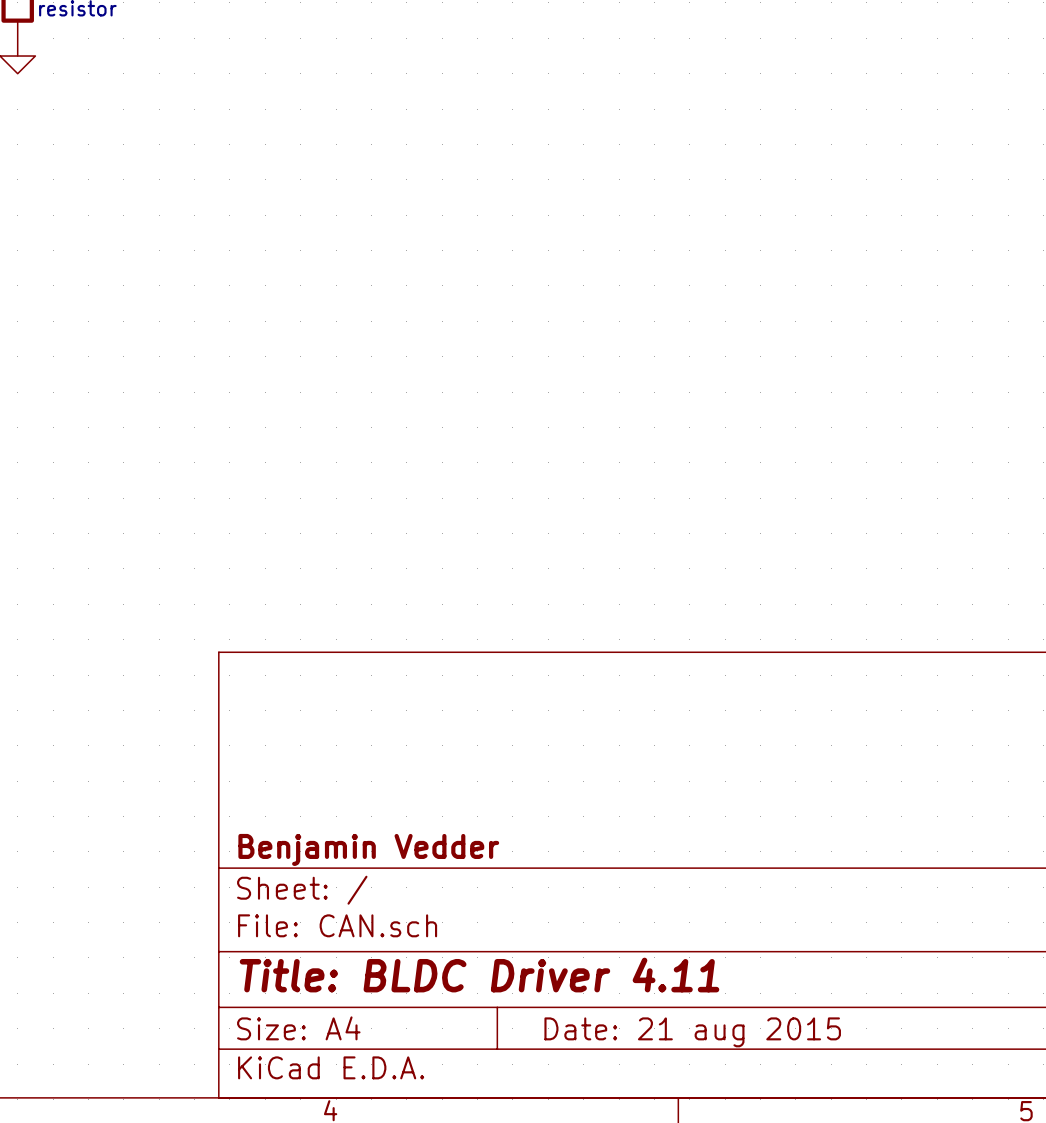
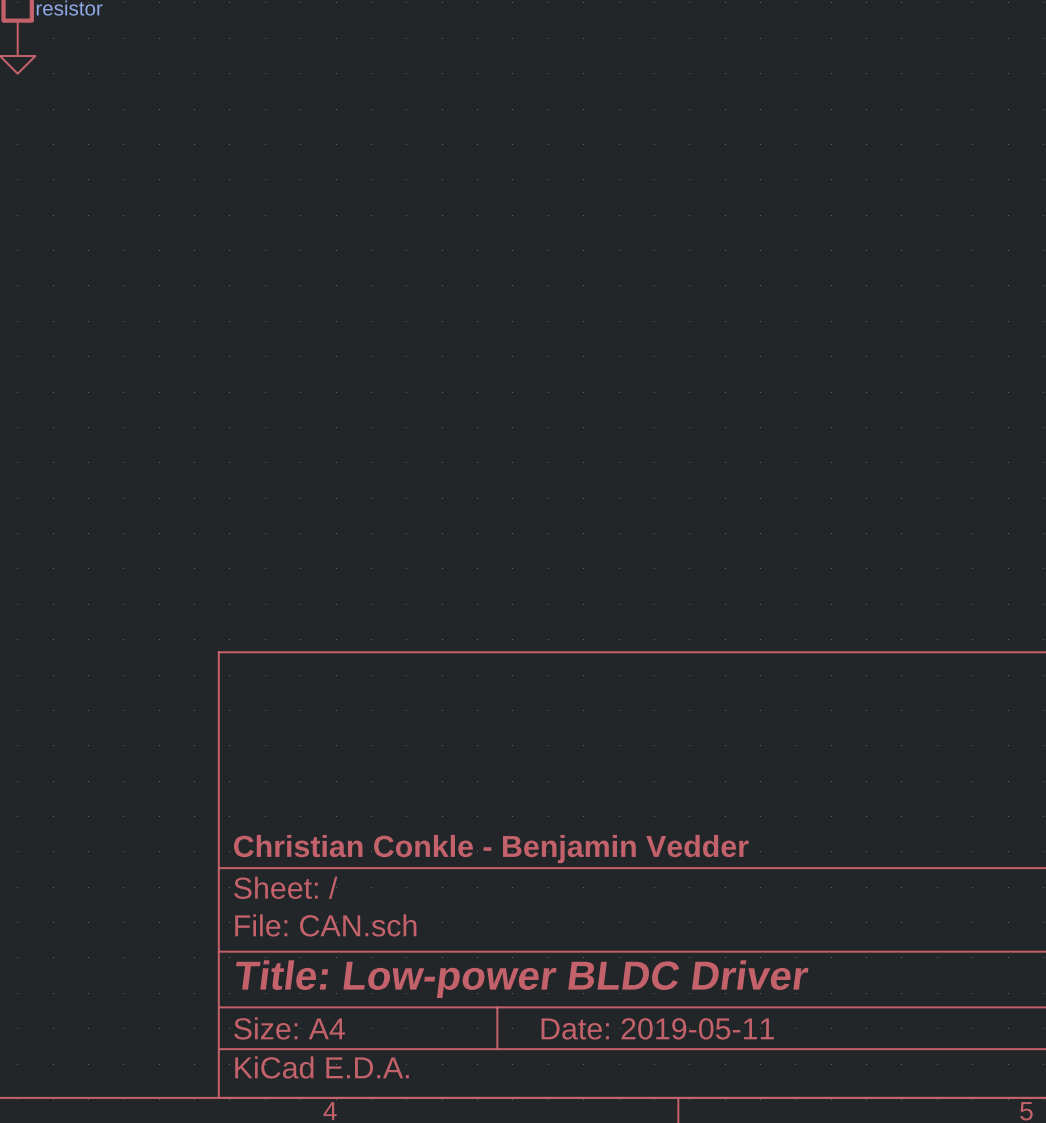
title block: Benjamin Vedder (368, 849) -> Christian Conkle - Benjamin Vedder (491, 849)
title block: Title: BLDC Driver 4.11 (479, 975) -> Title: Low-power BLDC Driver (522, 979)
title block: Date: 21 aug 2015 (692, 1032) -> Date: 2019-05-11 (657, 1028)

